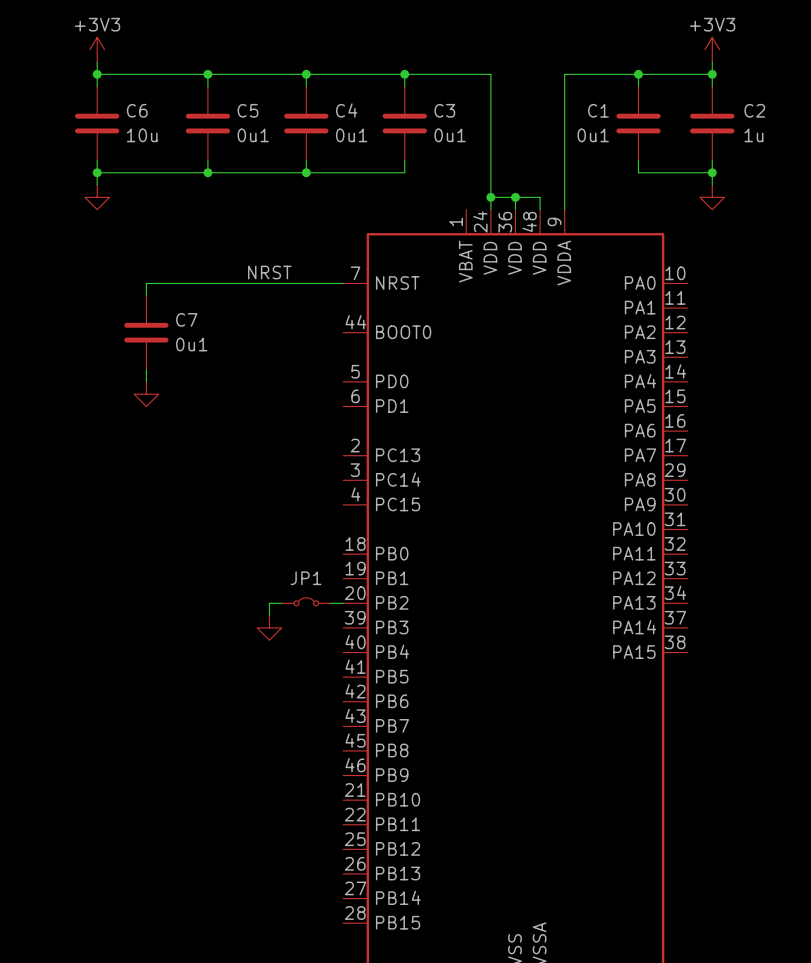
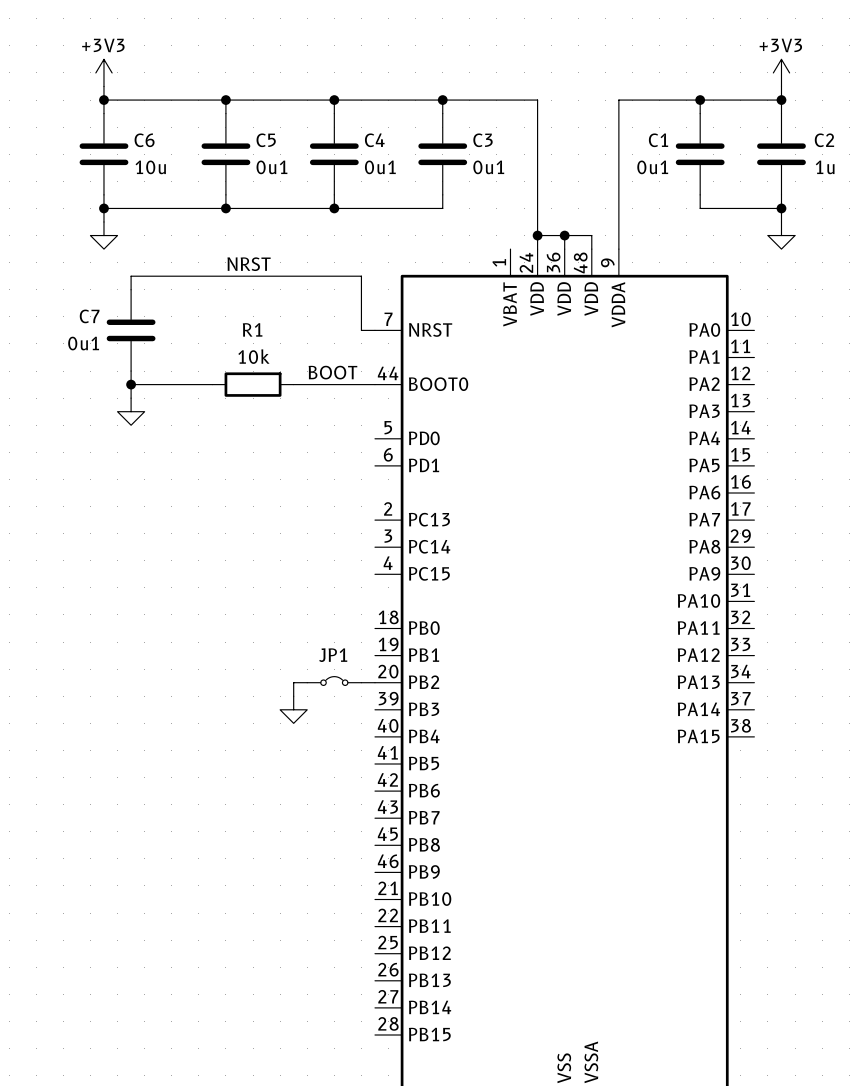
label position: NRST (269, 272) -> NRST (249, 264)
wire: (330, 283) (146, 283) (146, 295) -> (361, 330) (361, 276) (131, 276) (131, 289)
C7 name position: C7 (186, 319) -> C7 (89, 316)
wire: none -> (131, 371) (131, 398)
label: none -> BOOT (332, 372)
wire: none -> (131, 384) (212, 384)
junction: none -> (131, 384)
C7 position: (146, 332) -> (131, 330)
R1: none -> 10k (253, 384)
wire: none -> (293, 384) (374, 384)
C7 value position: 0u1 (191, 344) -> 0u1 (83, 343)
wire: (146, 369) (146, 381) -> none
power symbol position: (146, 394) -> (131, 411)

